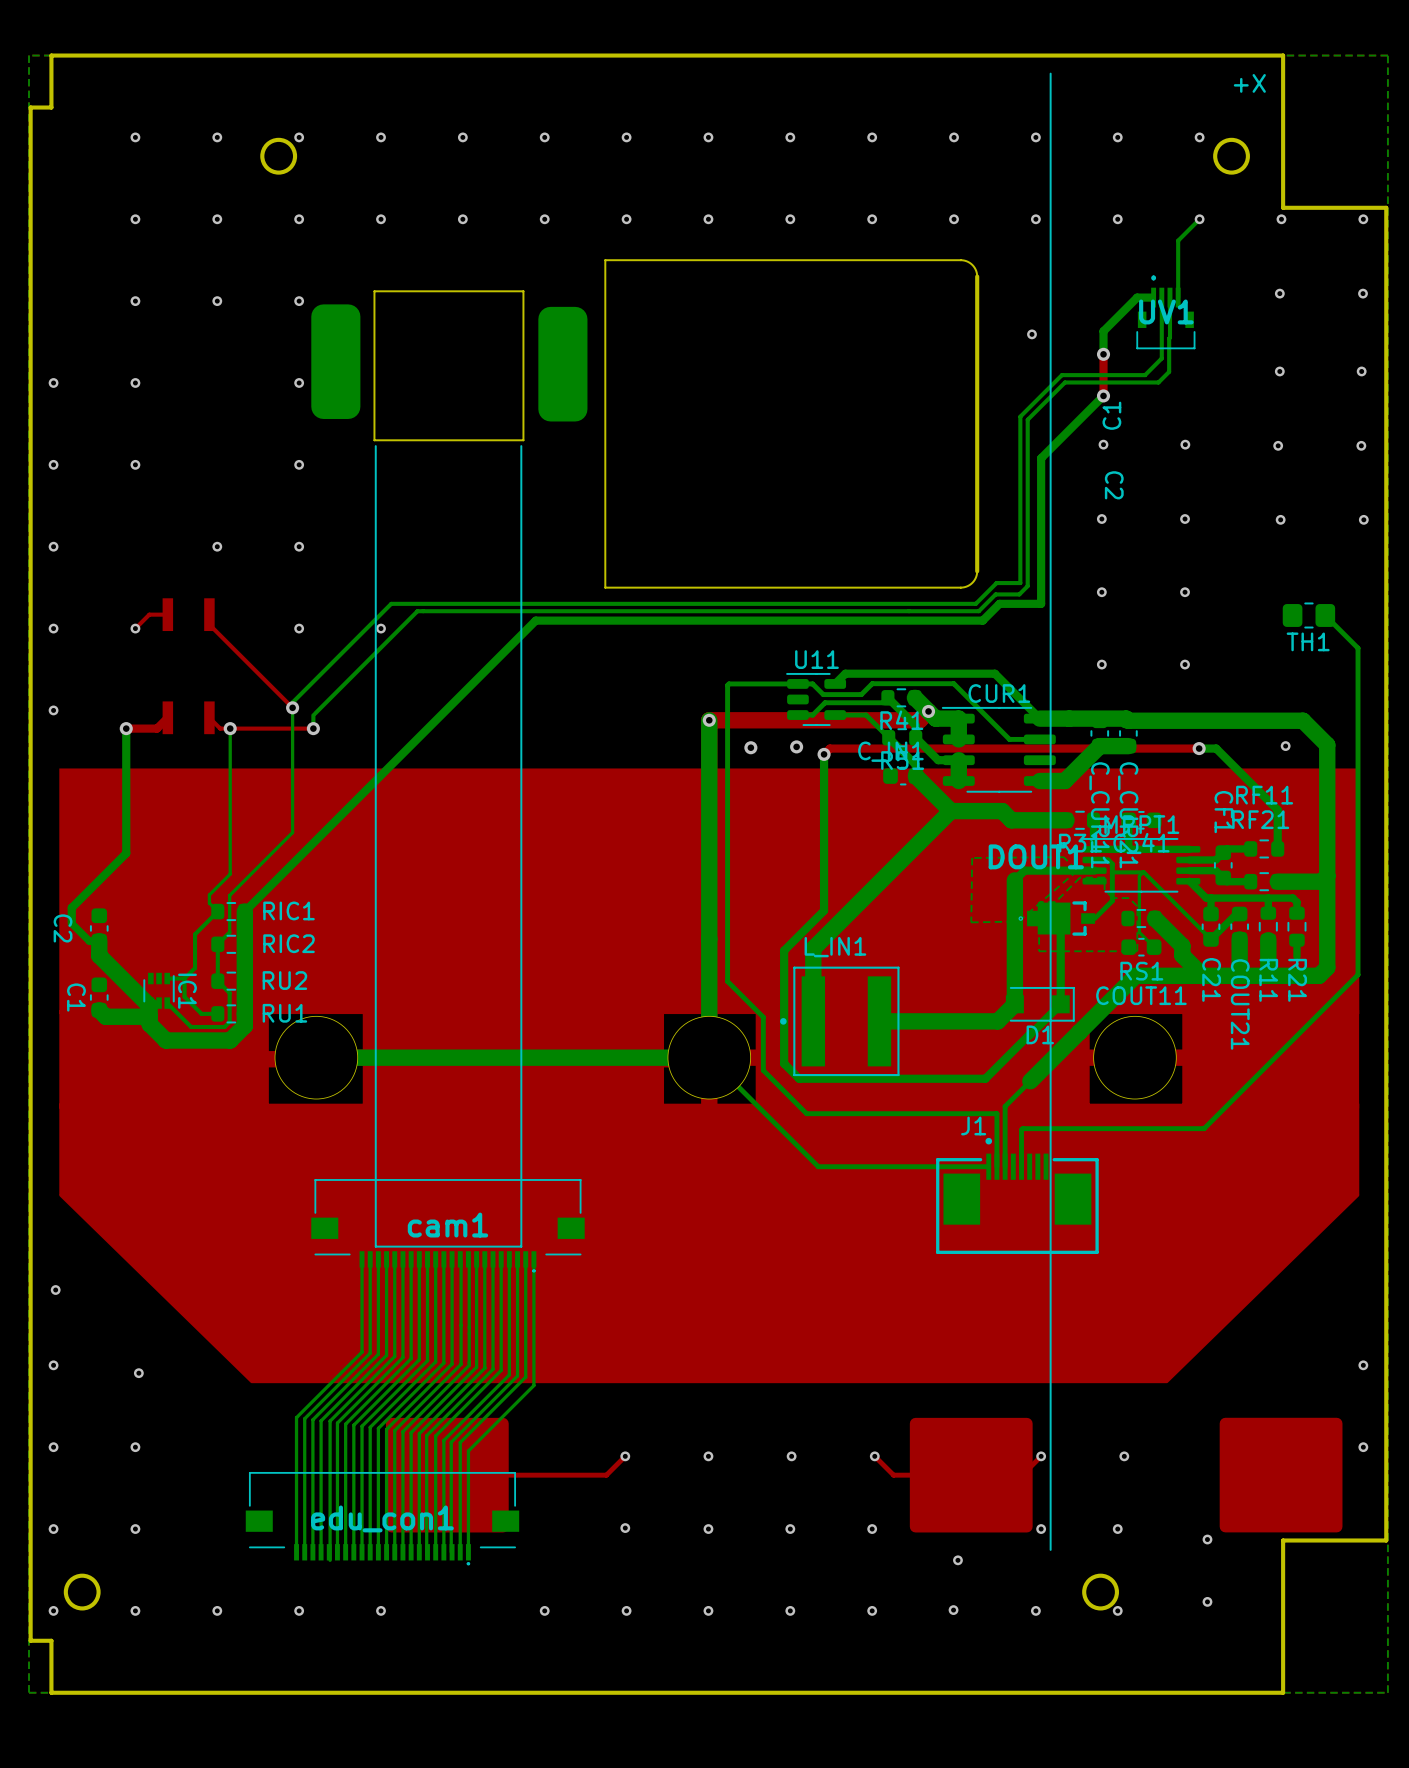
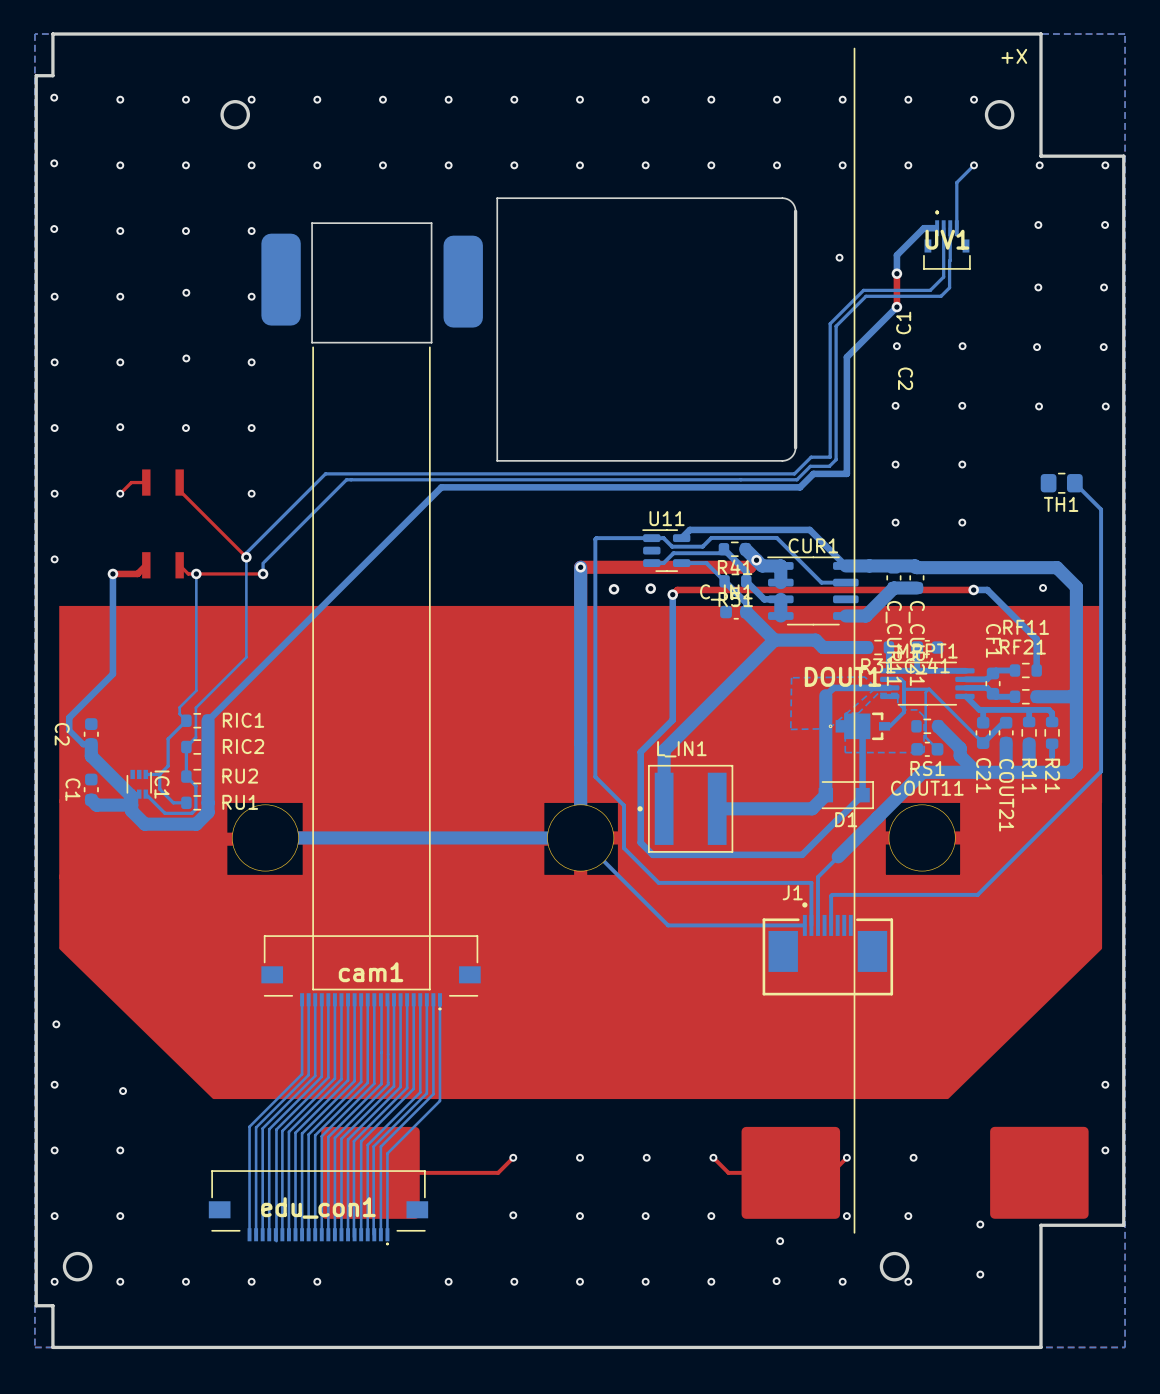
via: none -> (54, 97)
via: none -> (54, 163)
via: none -> (54, 229)
via: none -> (186, 292)
via: none -> (186, 358)
via: none -> (120, 427)
via: (381, 628) -> none

